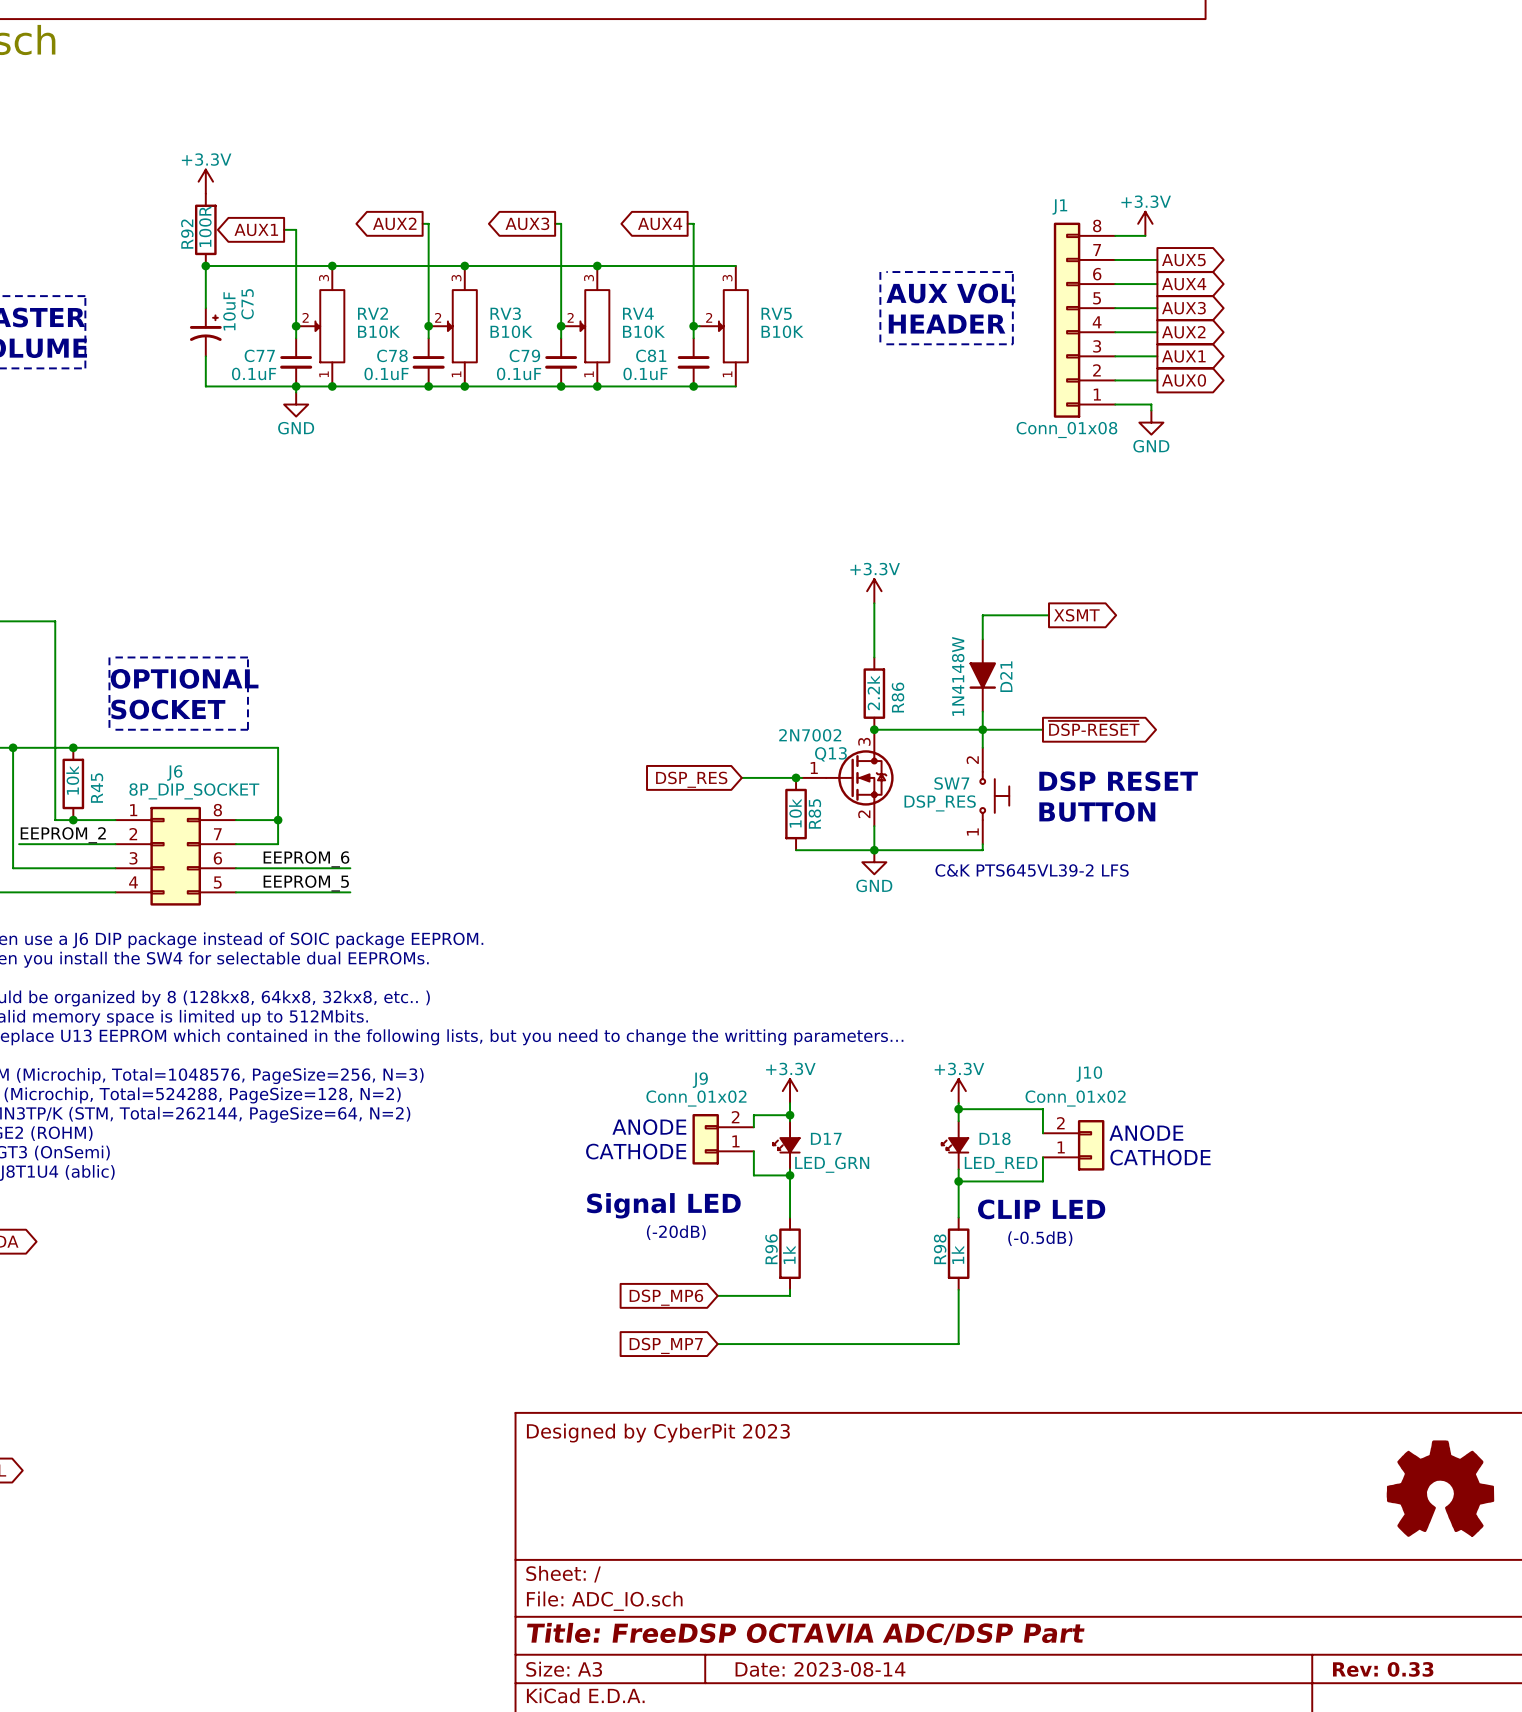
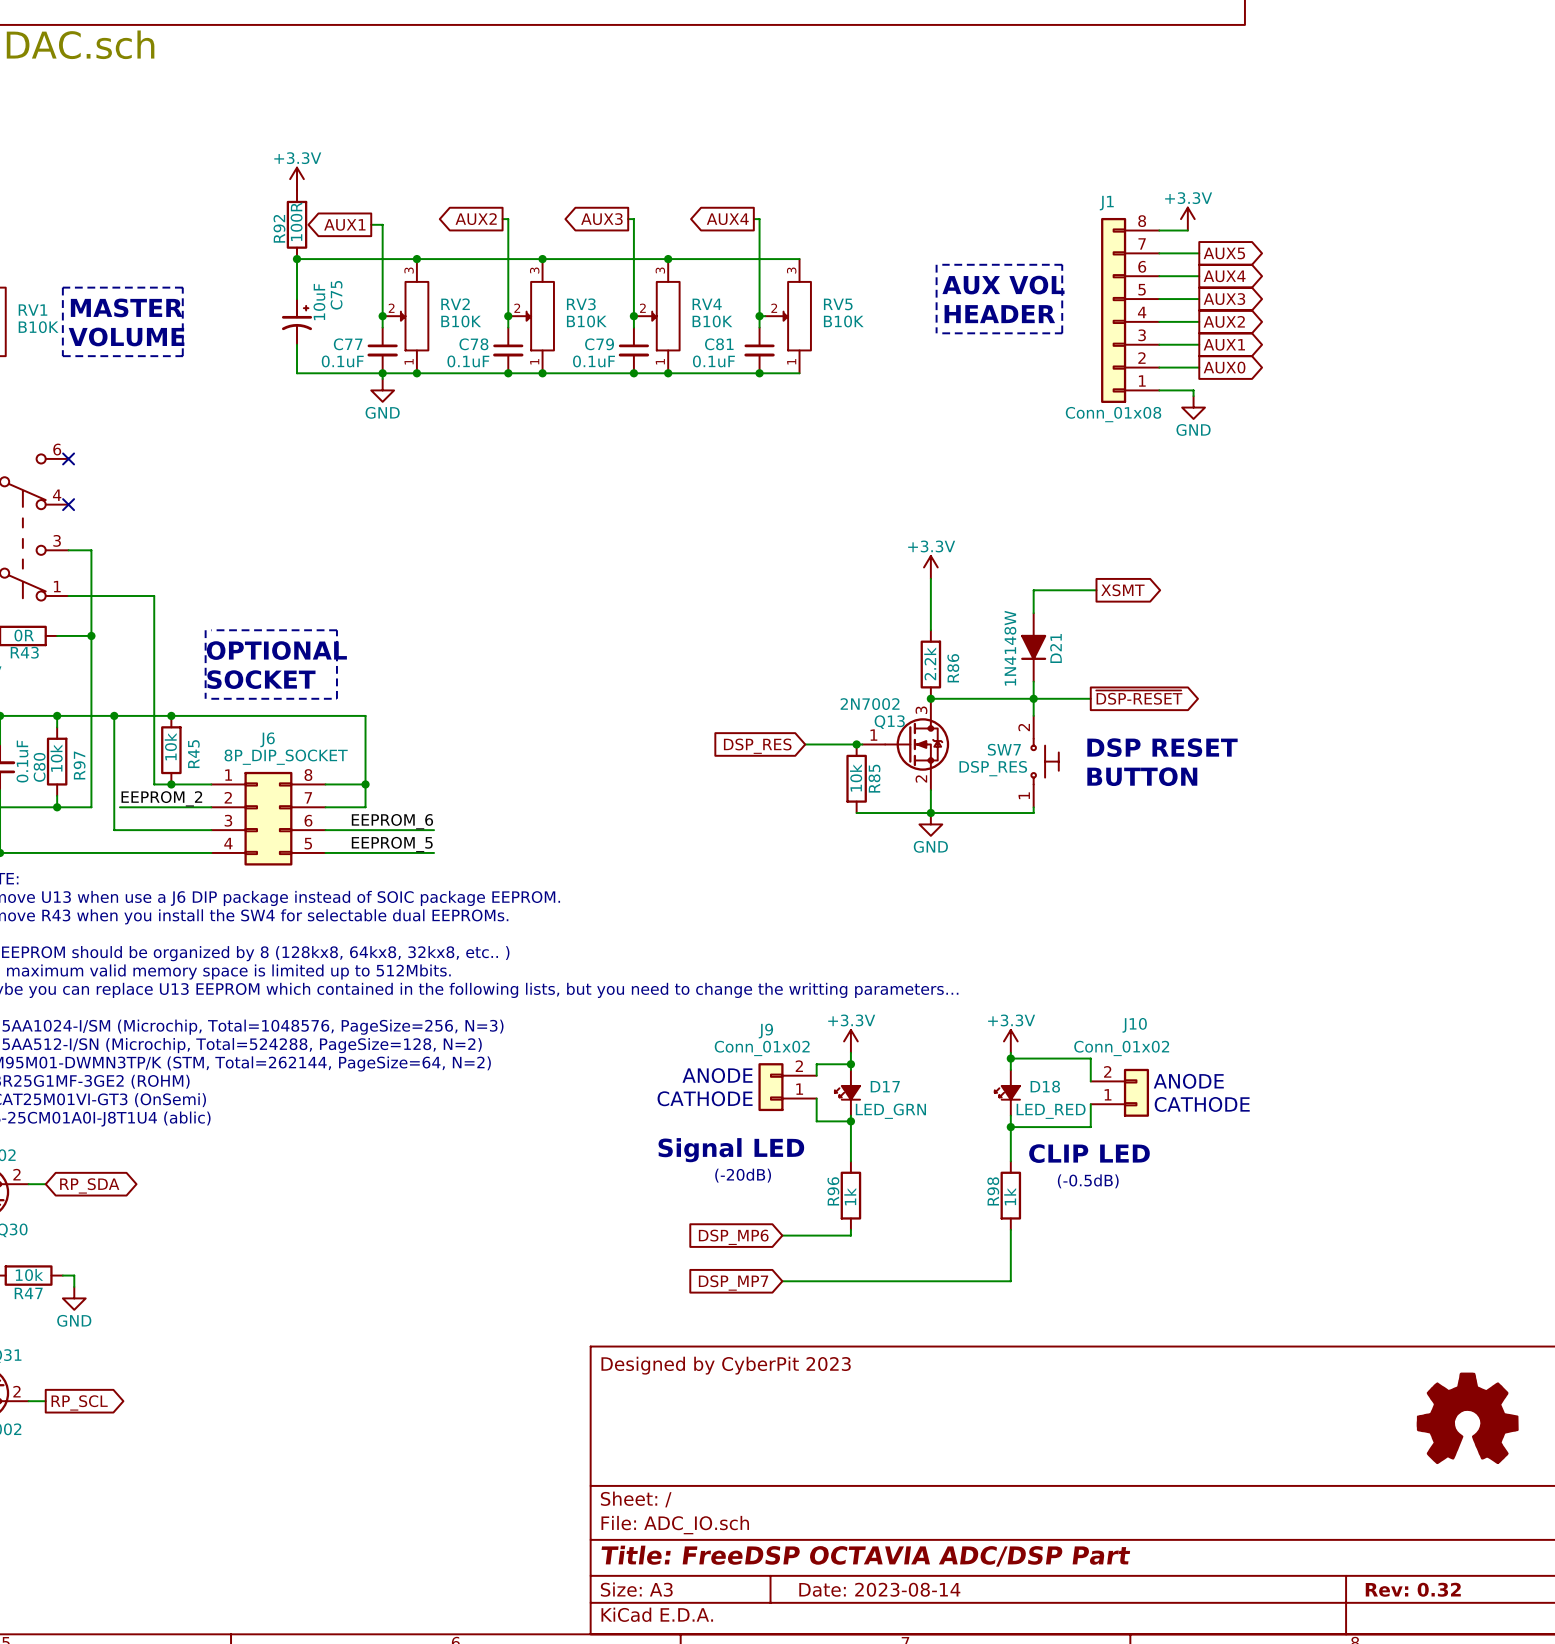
text: C&K PTS645VL39-2 LFS (1032, 870) -> none
title block: Rev: 0.33 (1383, 1669) -> Rev: 0.32 (1413, 1589)

